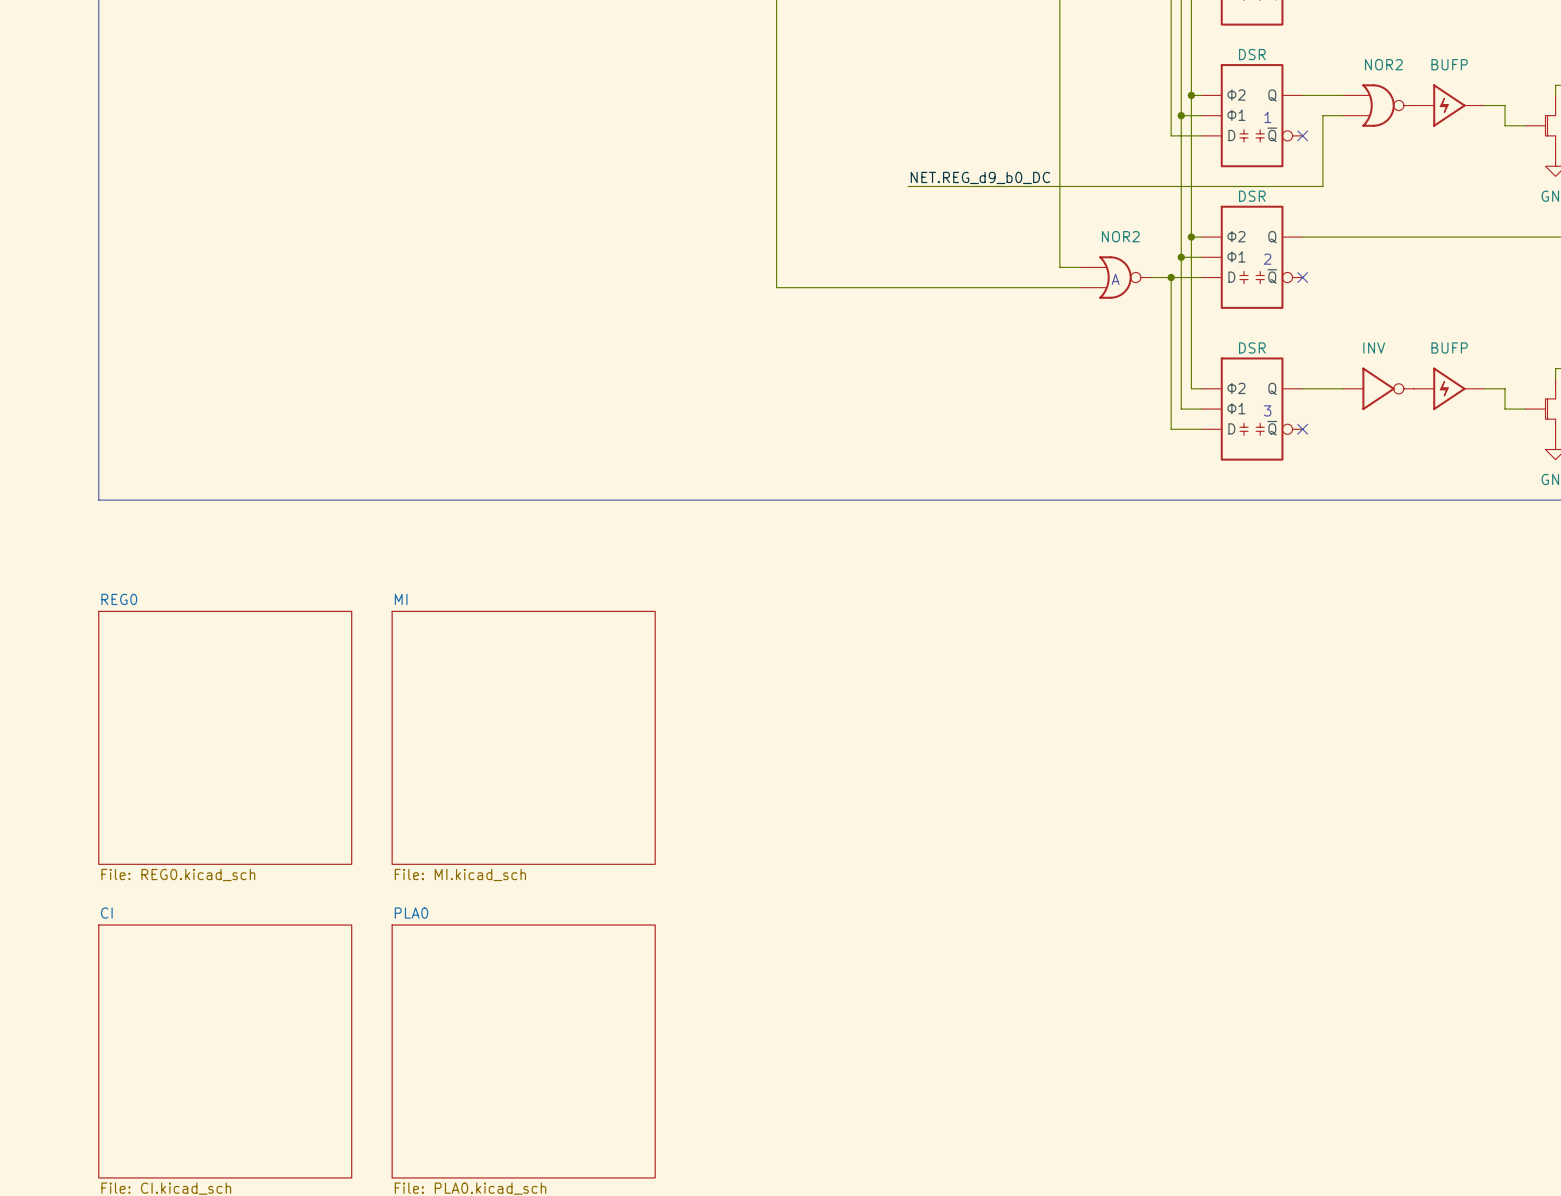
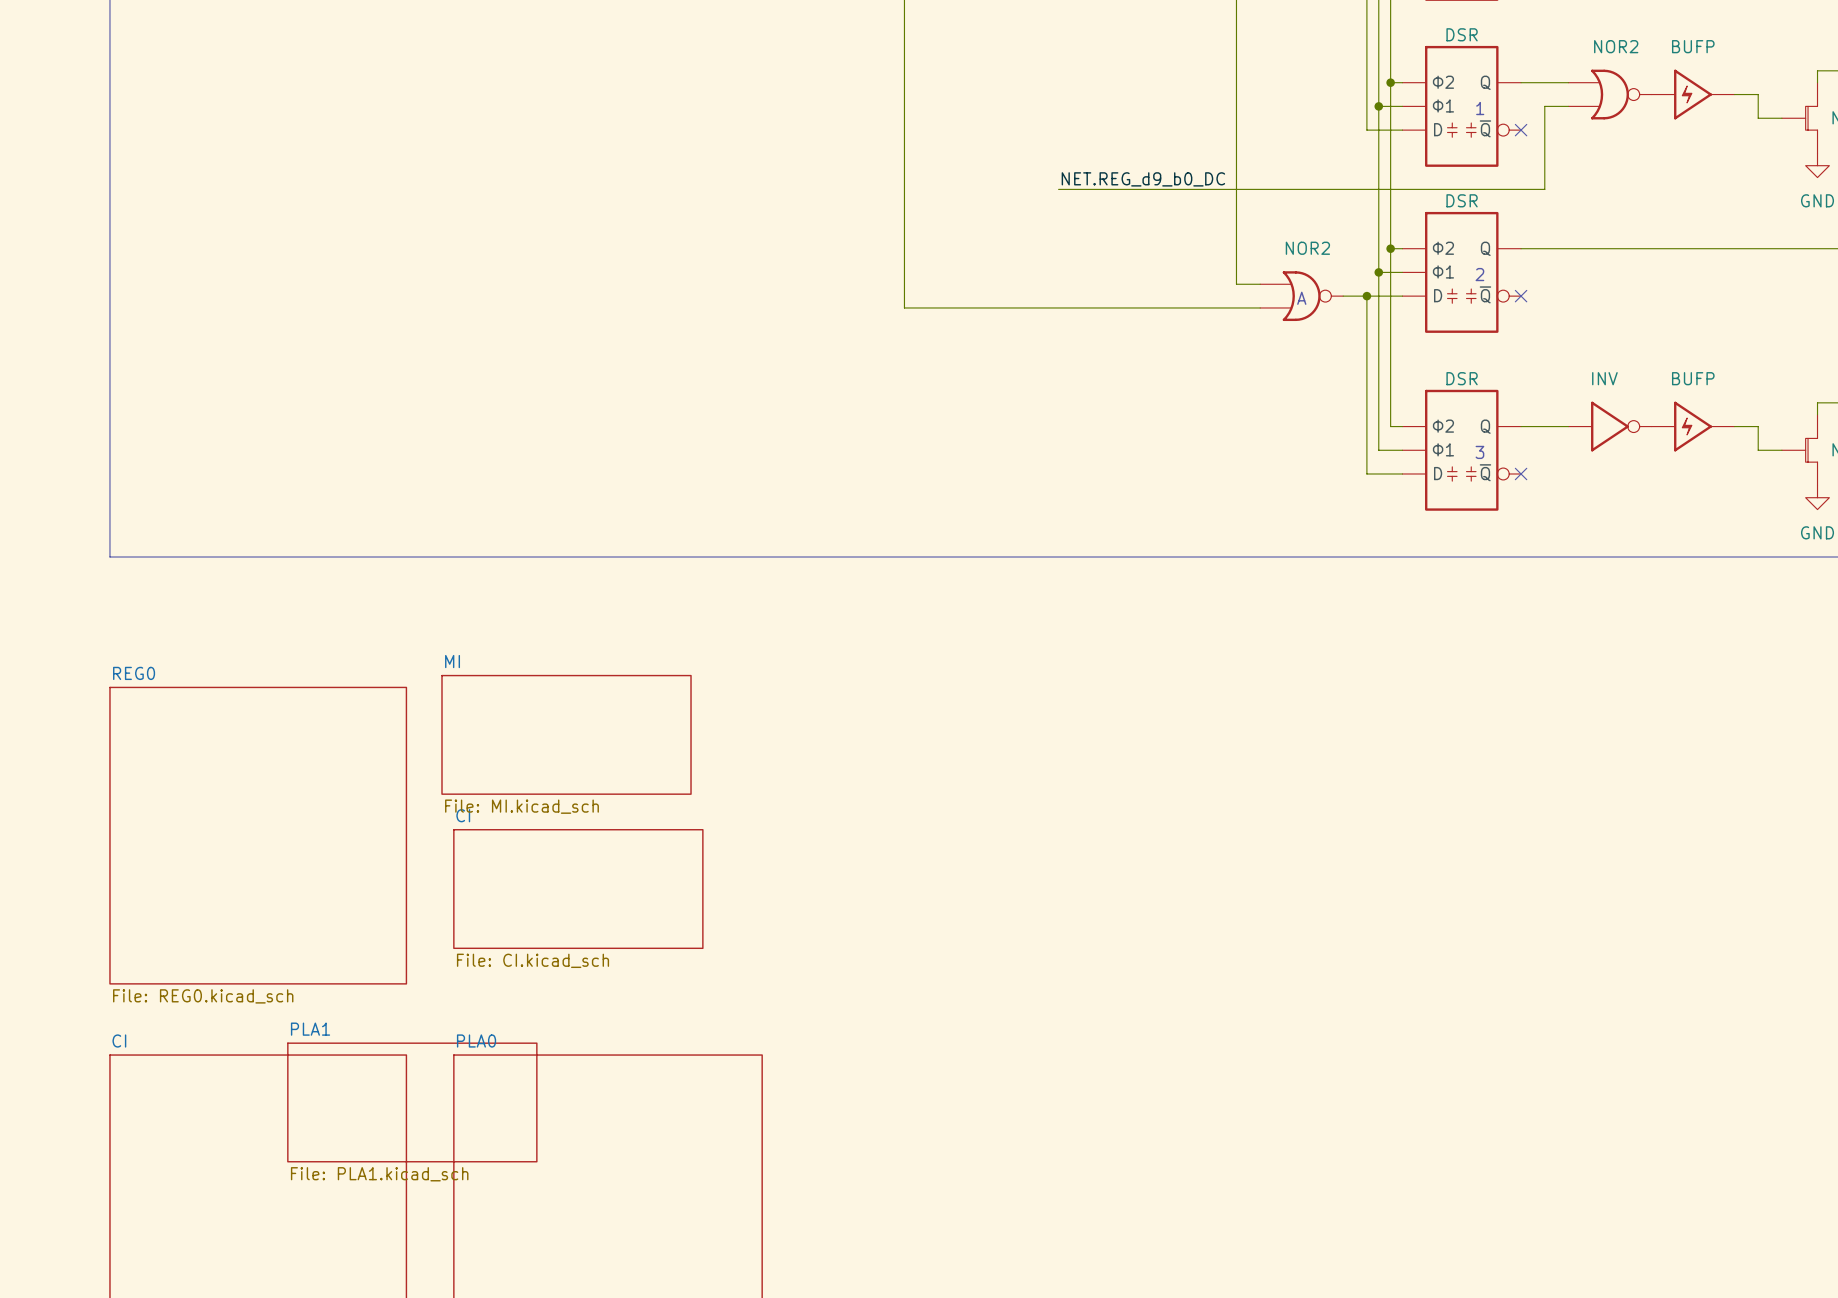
sheet MI: none -> File: MI.kicad_sch (566, 734)
sheet MI: File: MI.kicad_sch (523, 737) -> none
sheet CI: none -> File: CI.kicad_sch (578, 889)
sheet PLA1: none -> File: PLA1.kicad_sch (412, 1102)

